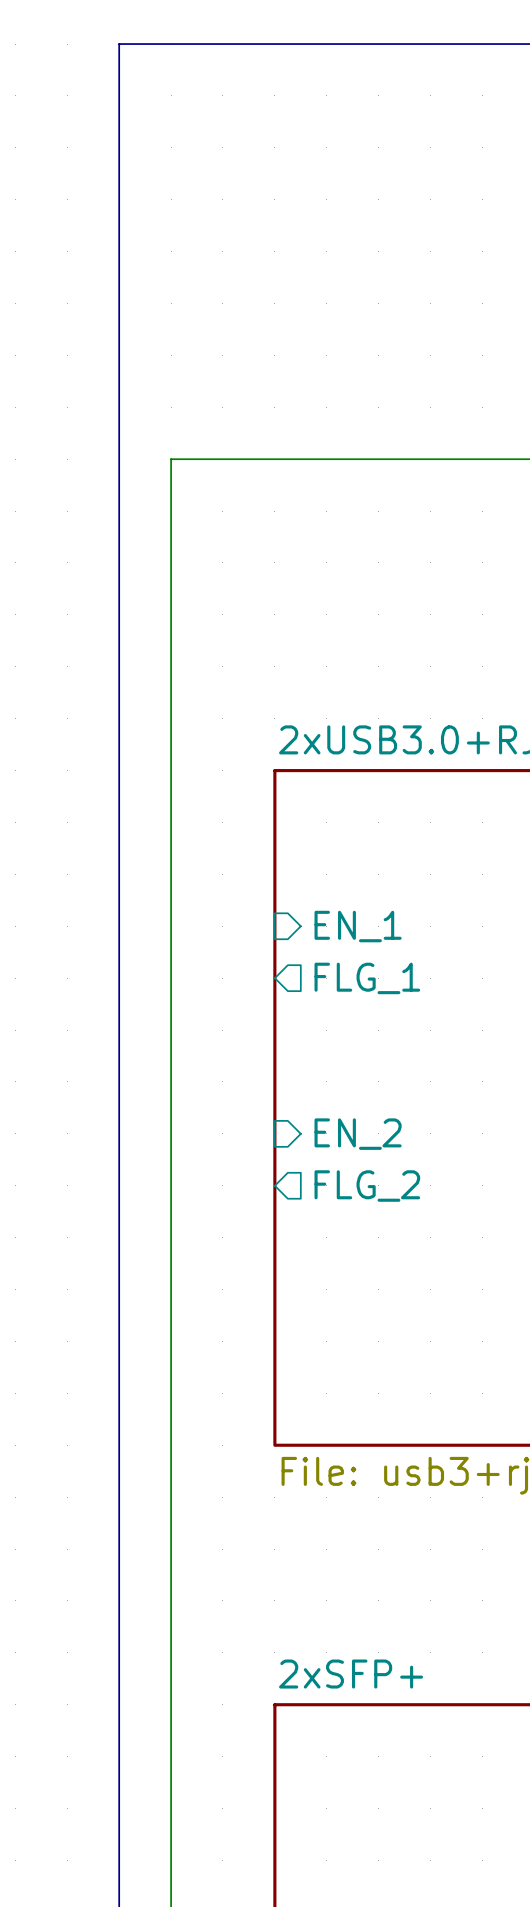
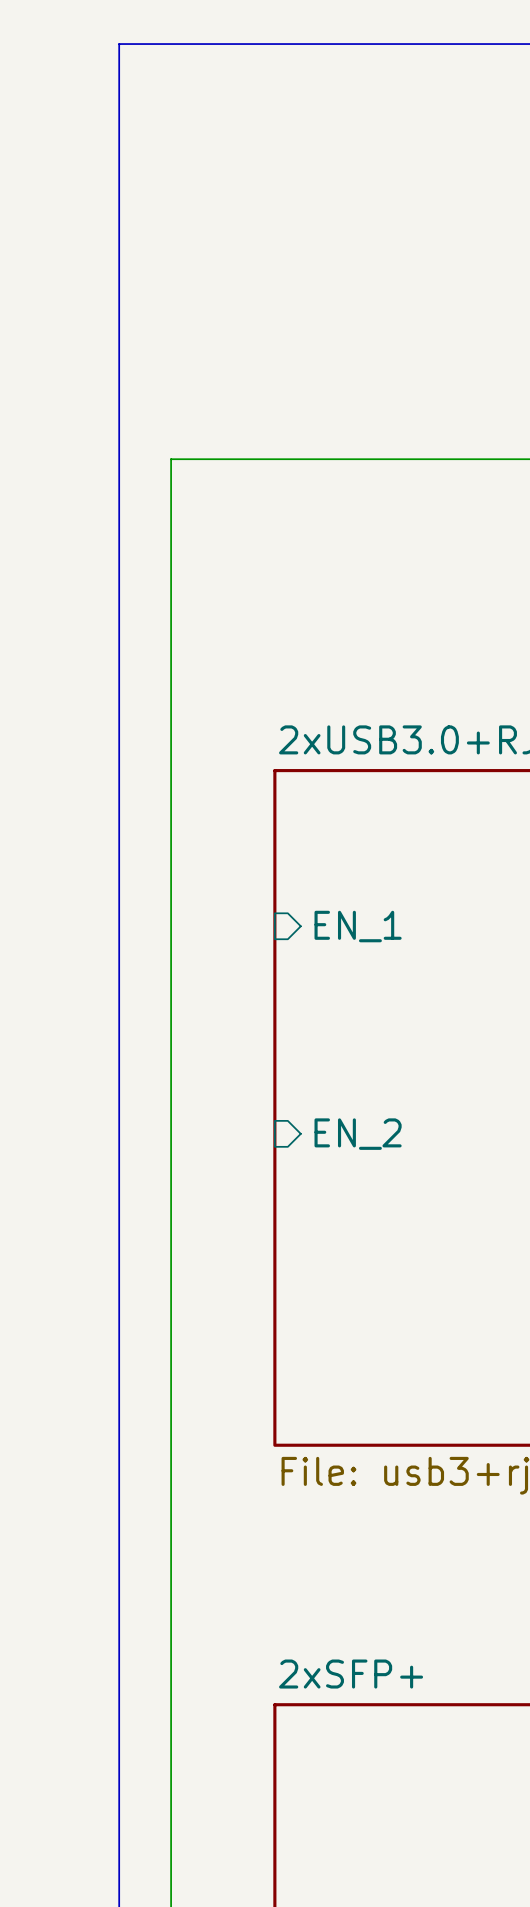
sheet pin: FLG_1 (367, 978) -> none
sheet pin: FLG_2 (367, 1186) -> none

